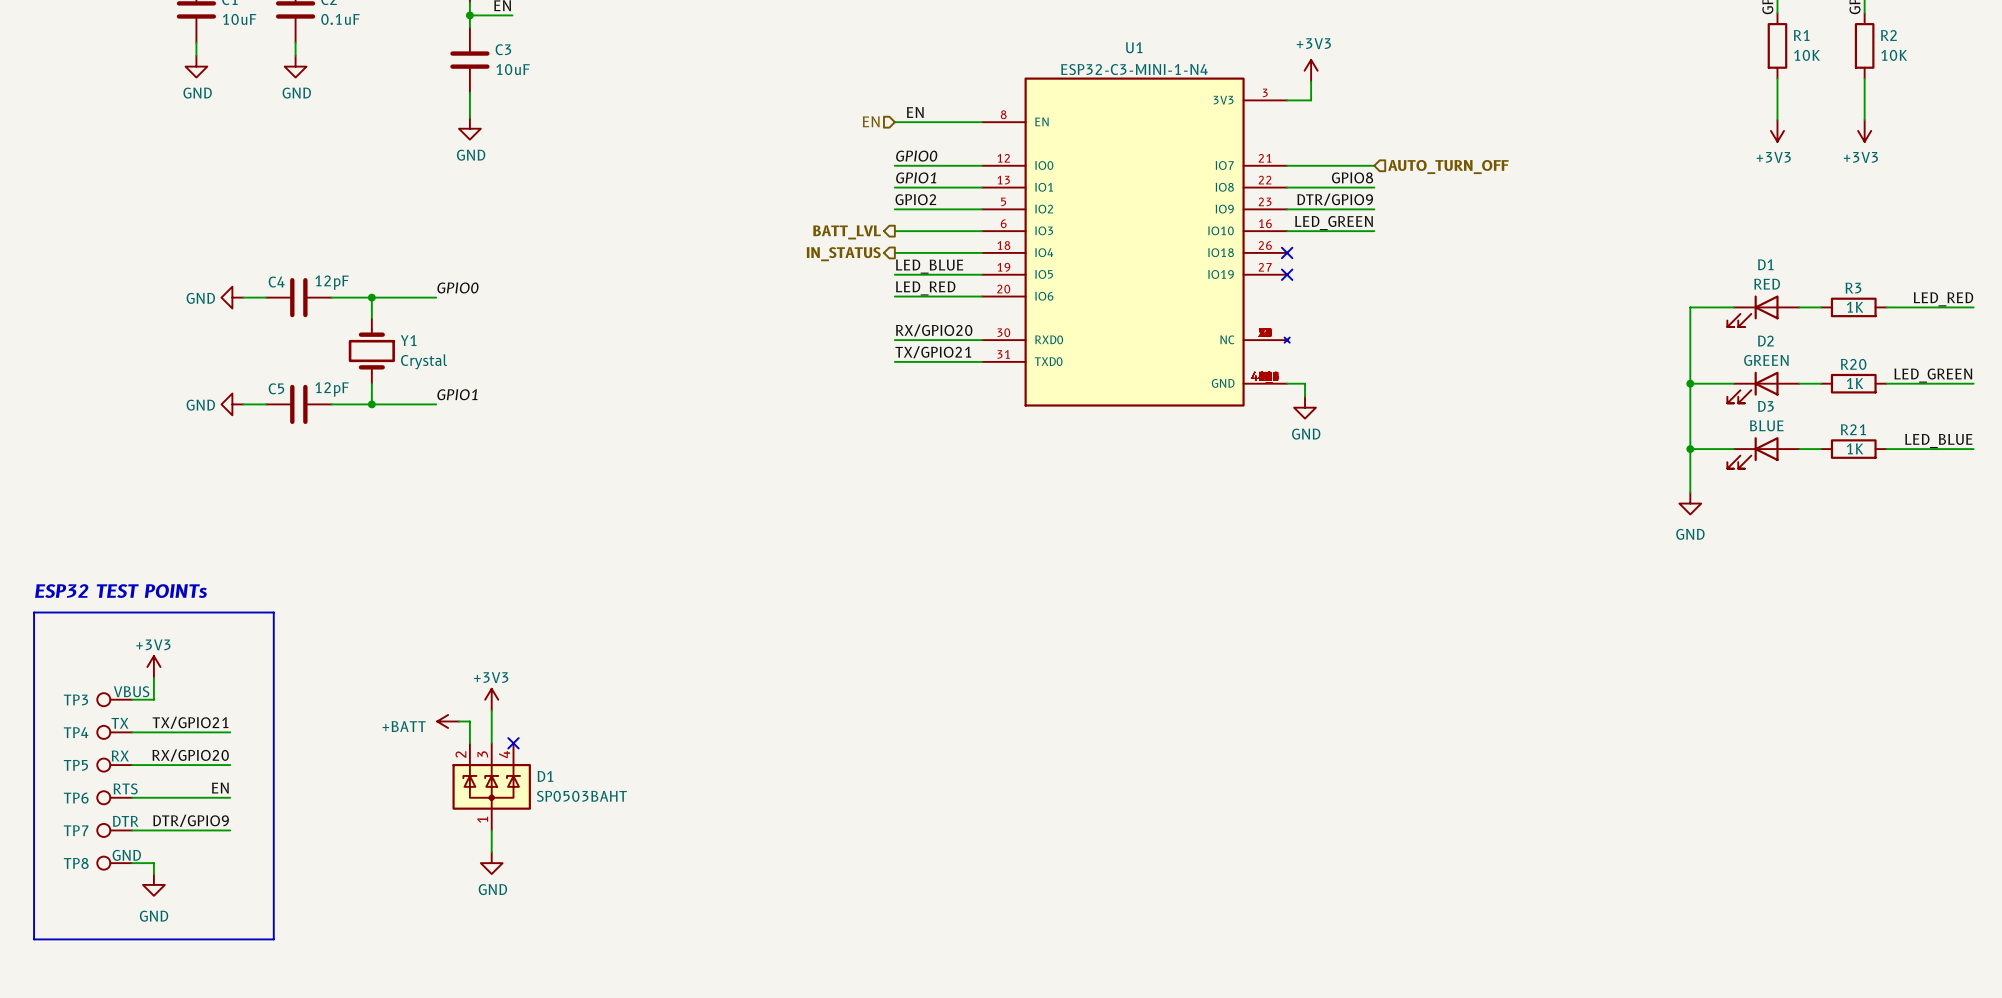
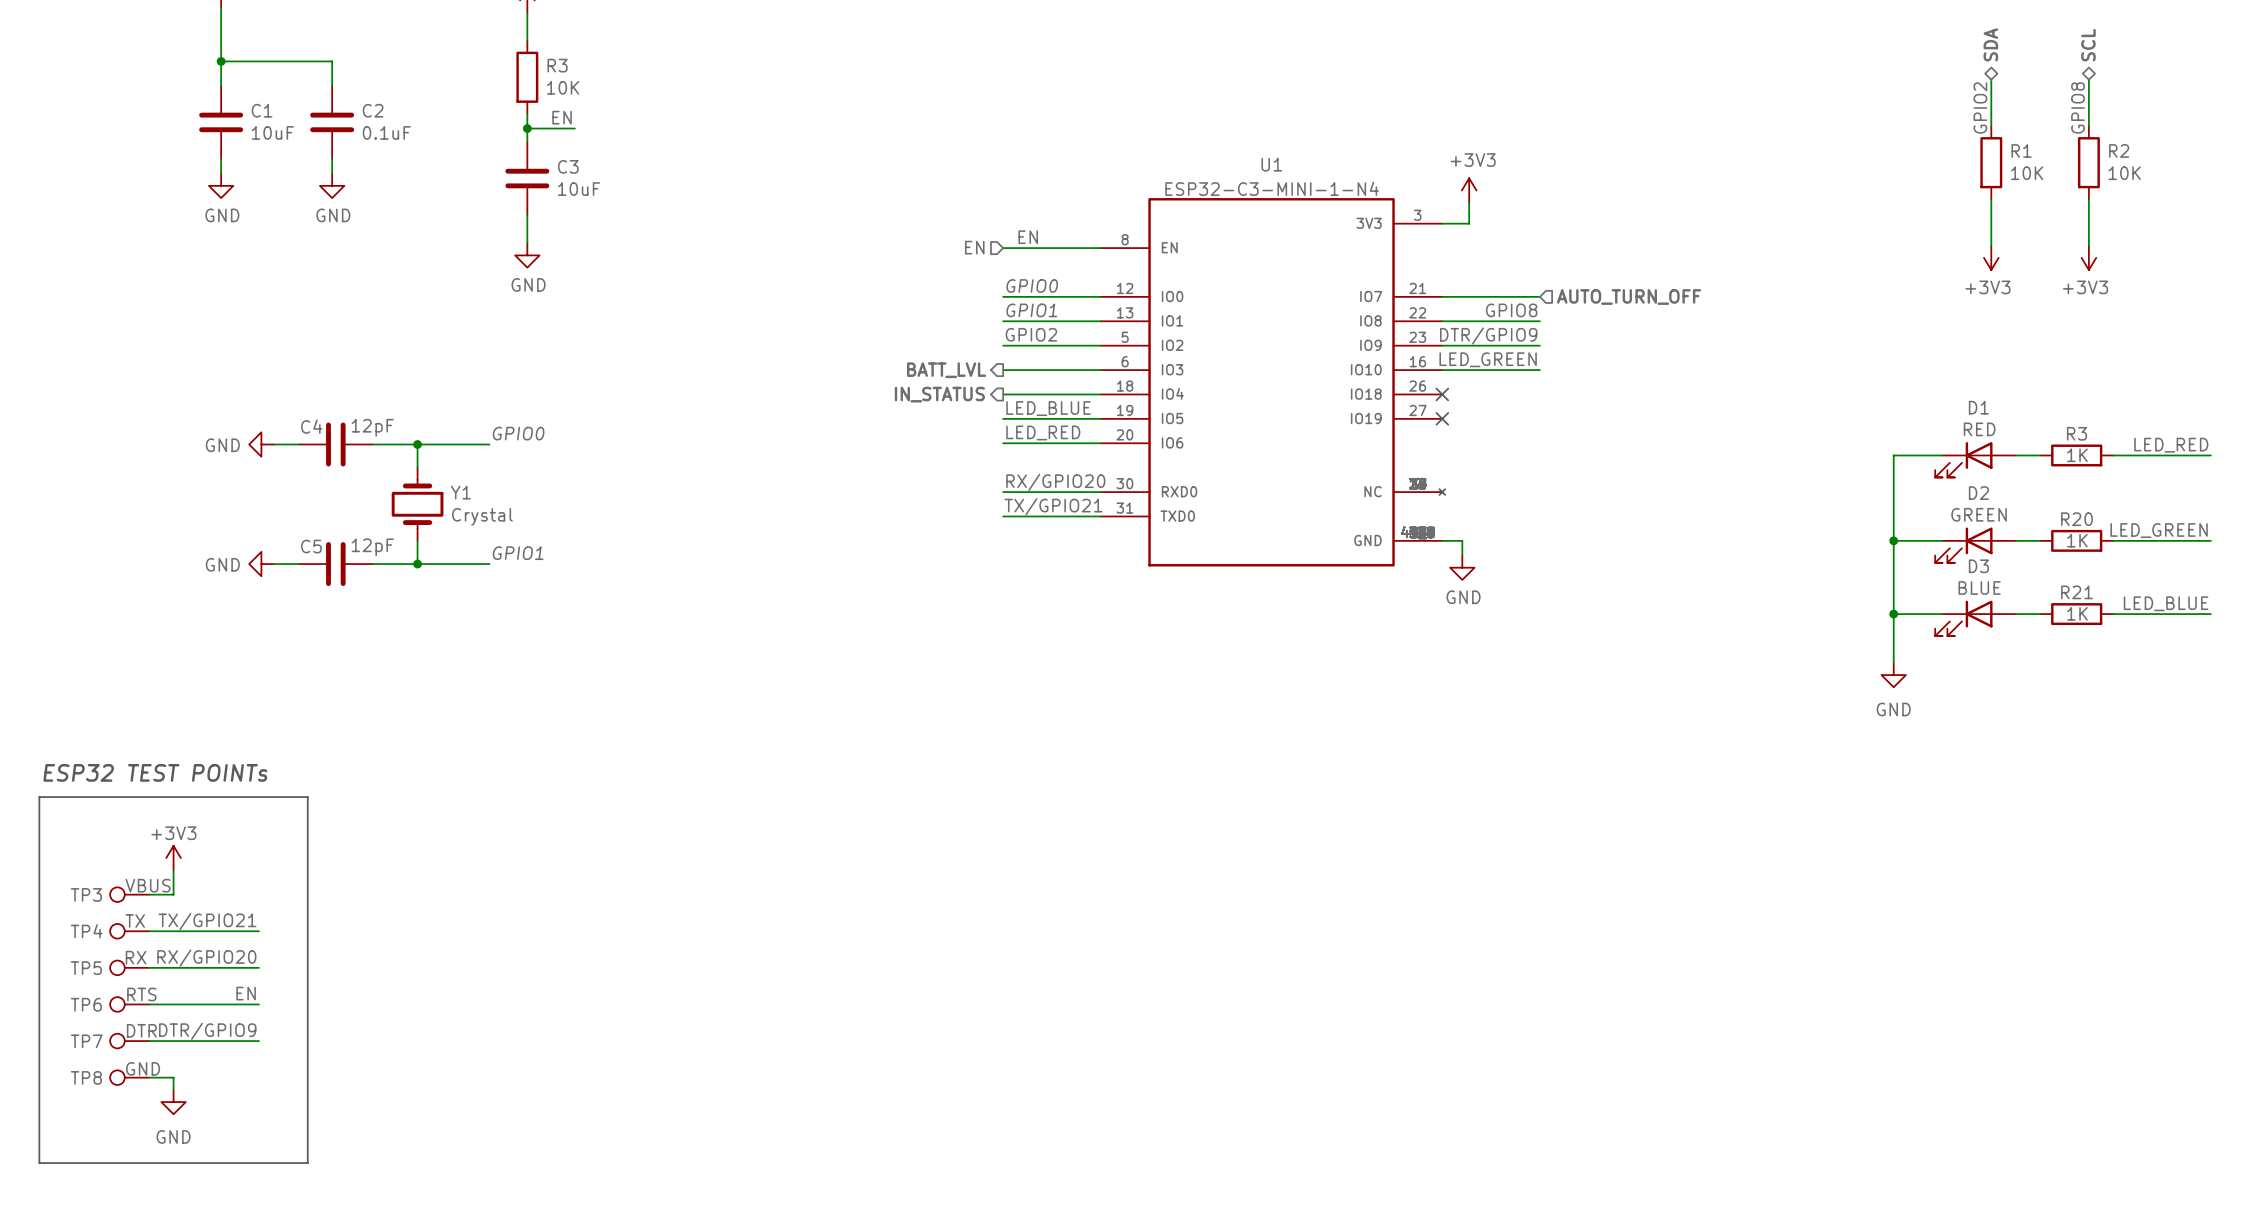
power symbol: +3V3 (491, 699) -> none
wire: (491, 710) (491, 743) -> none
power symbol: +BATT (448, 721) -> none
wire: (459, 721) (469, 721) (469, 743) -> none
no-connect mark: (513, 743) -> none
D1: SP0503BAHT (491, 786) -> none
wire: (491, 830) (491, 852) -> none
power symbol: GND (491, 863) -> none

